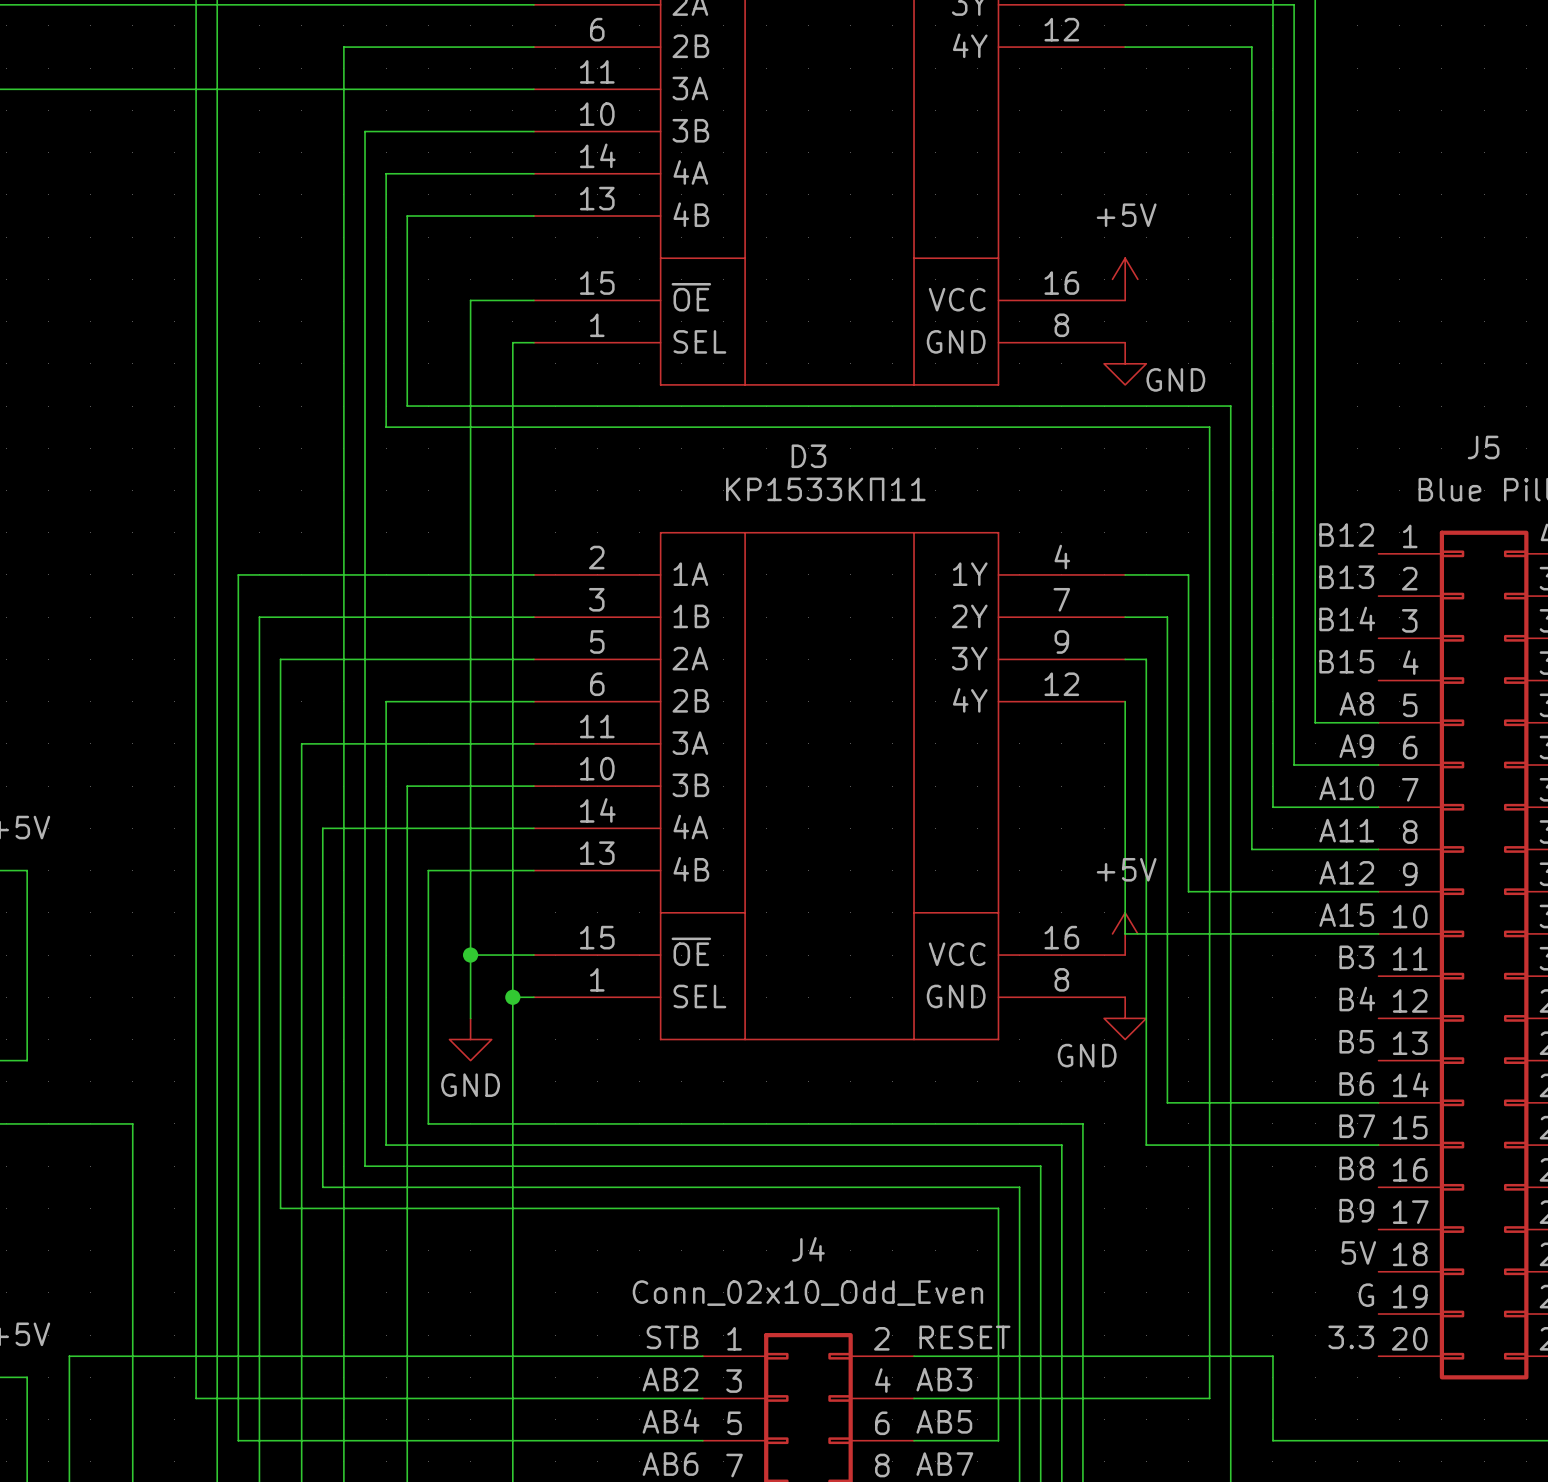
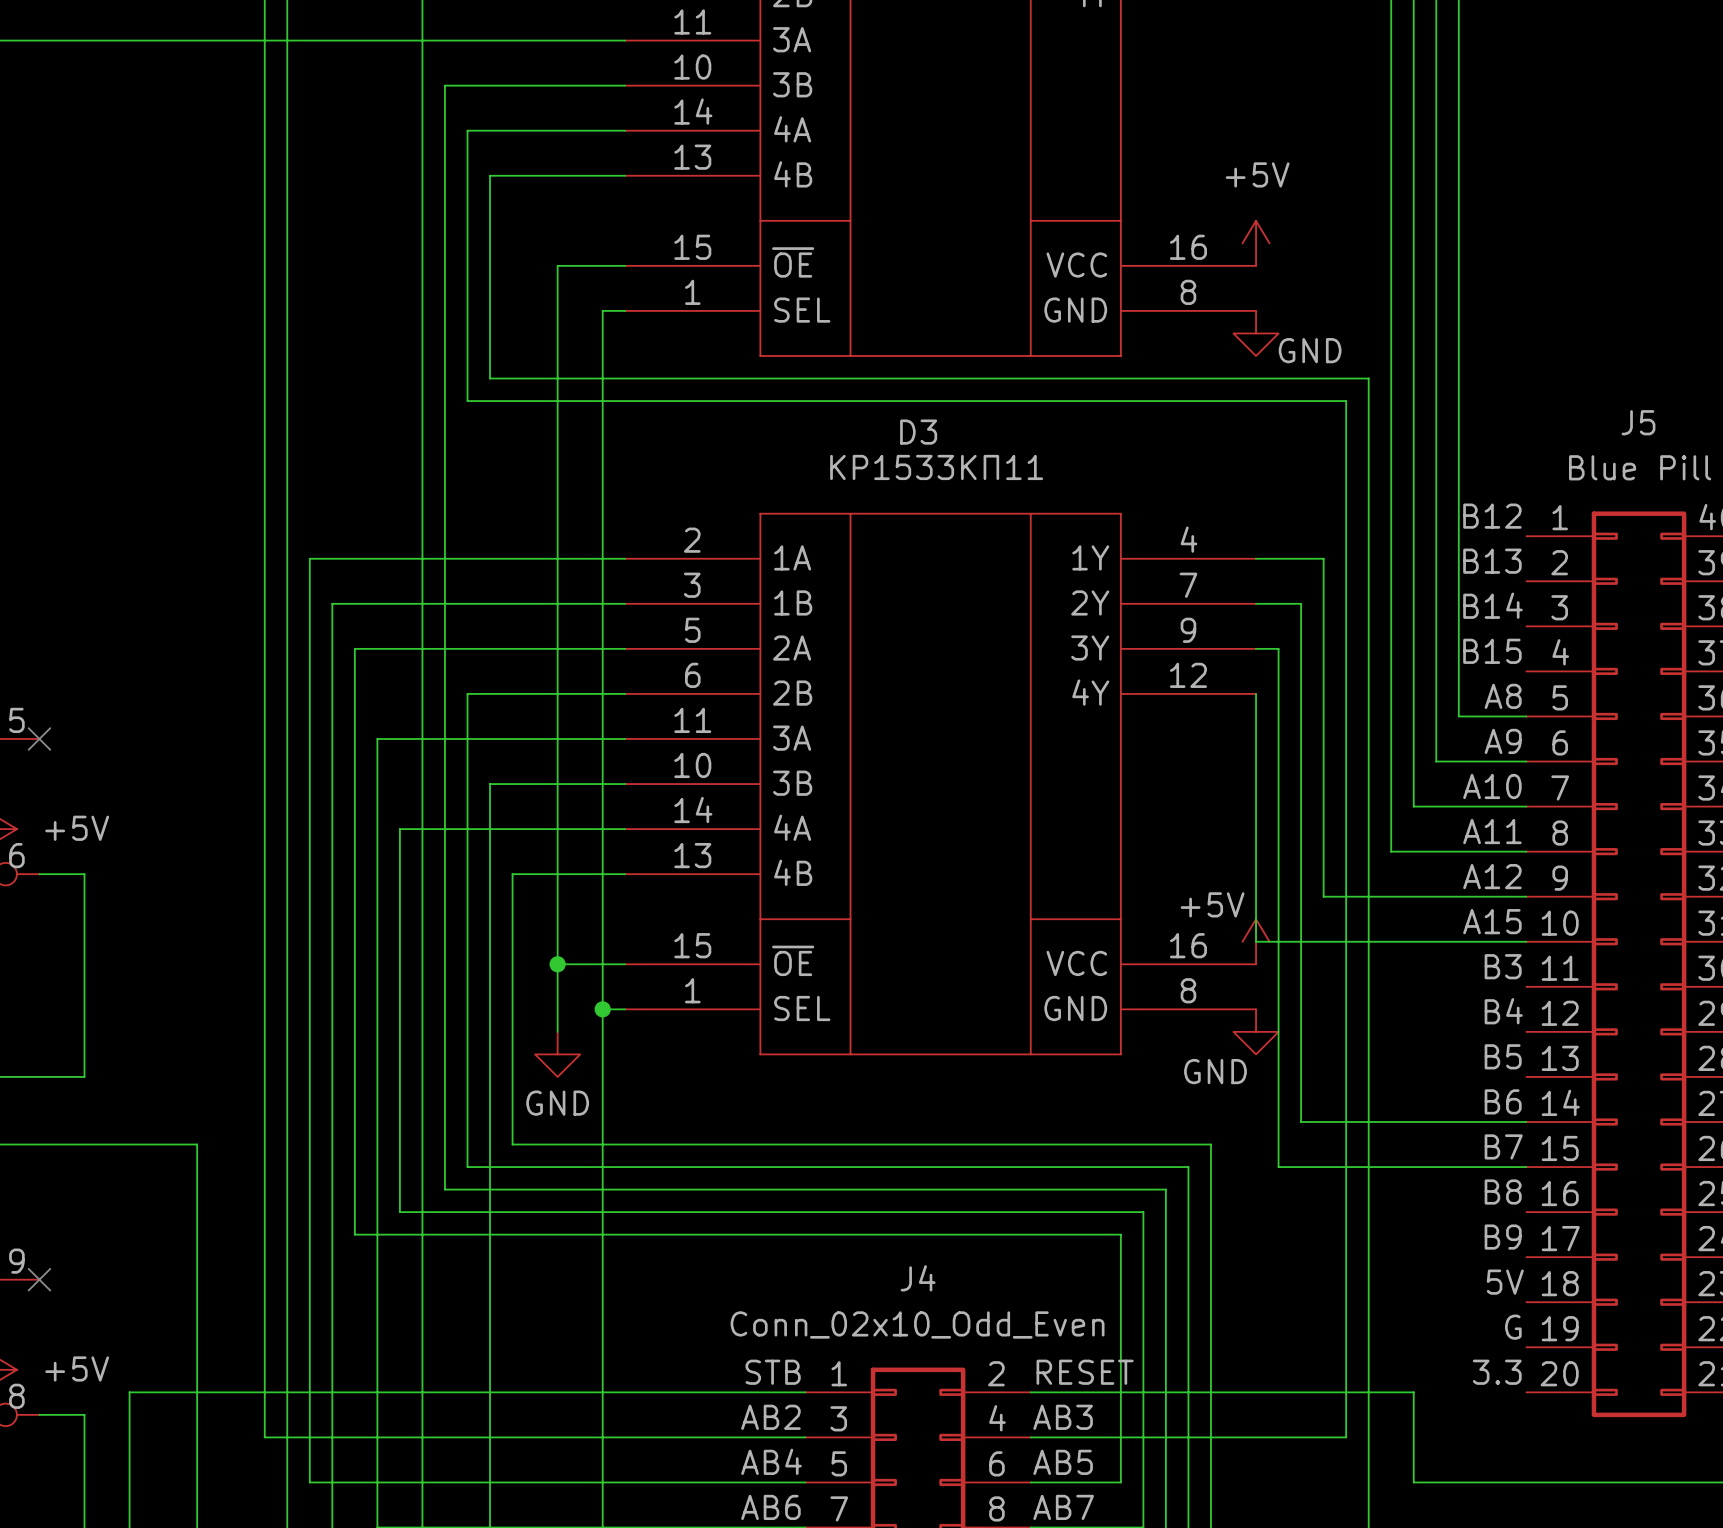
power symbol text position: +5V (1126, 869) -> +5V (1212, 904)

